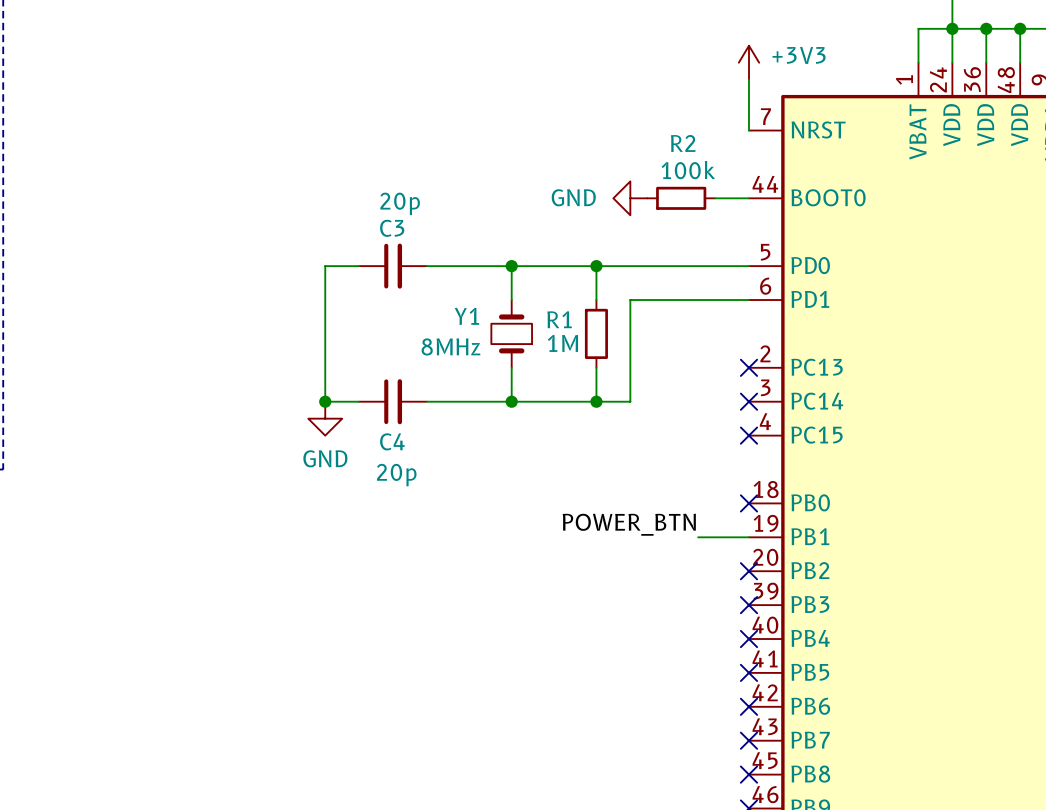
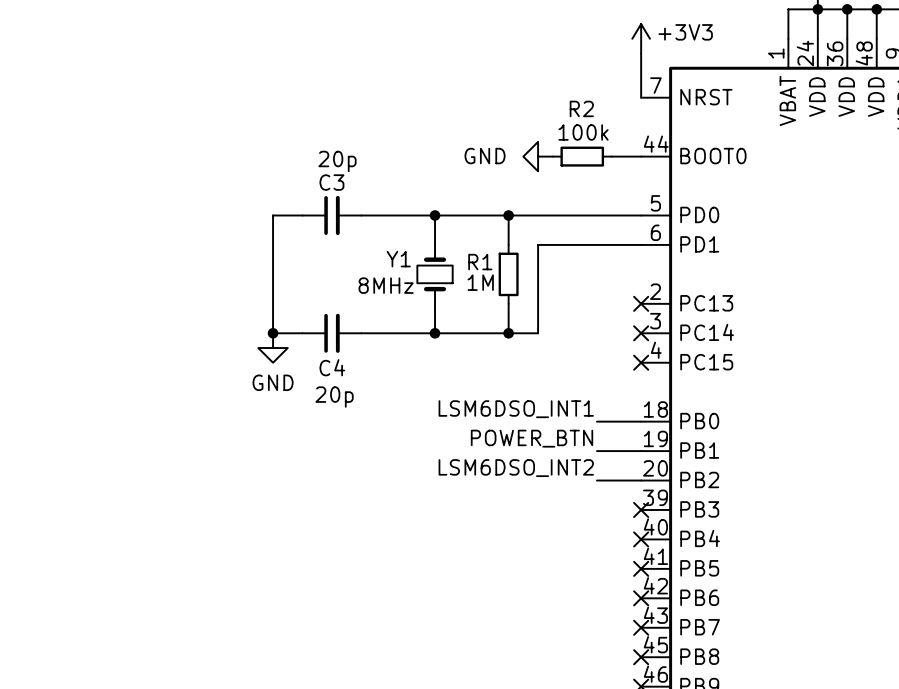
label: none -> LSM6DSO_INT1 (516, 409)
wire: none -> (596, 421) (641, 421)
no-connect mark: (748, 503) -> none
label: none -> LSM6DSO_INT2 (516, 468)
wire: none -> (596, 480) (641, 480)
no-connect mark: (748, 571) -> none

